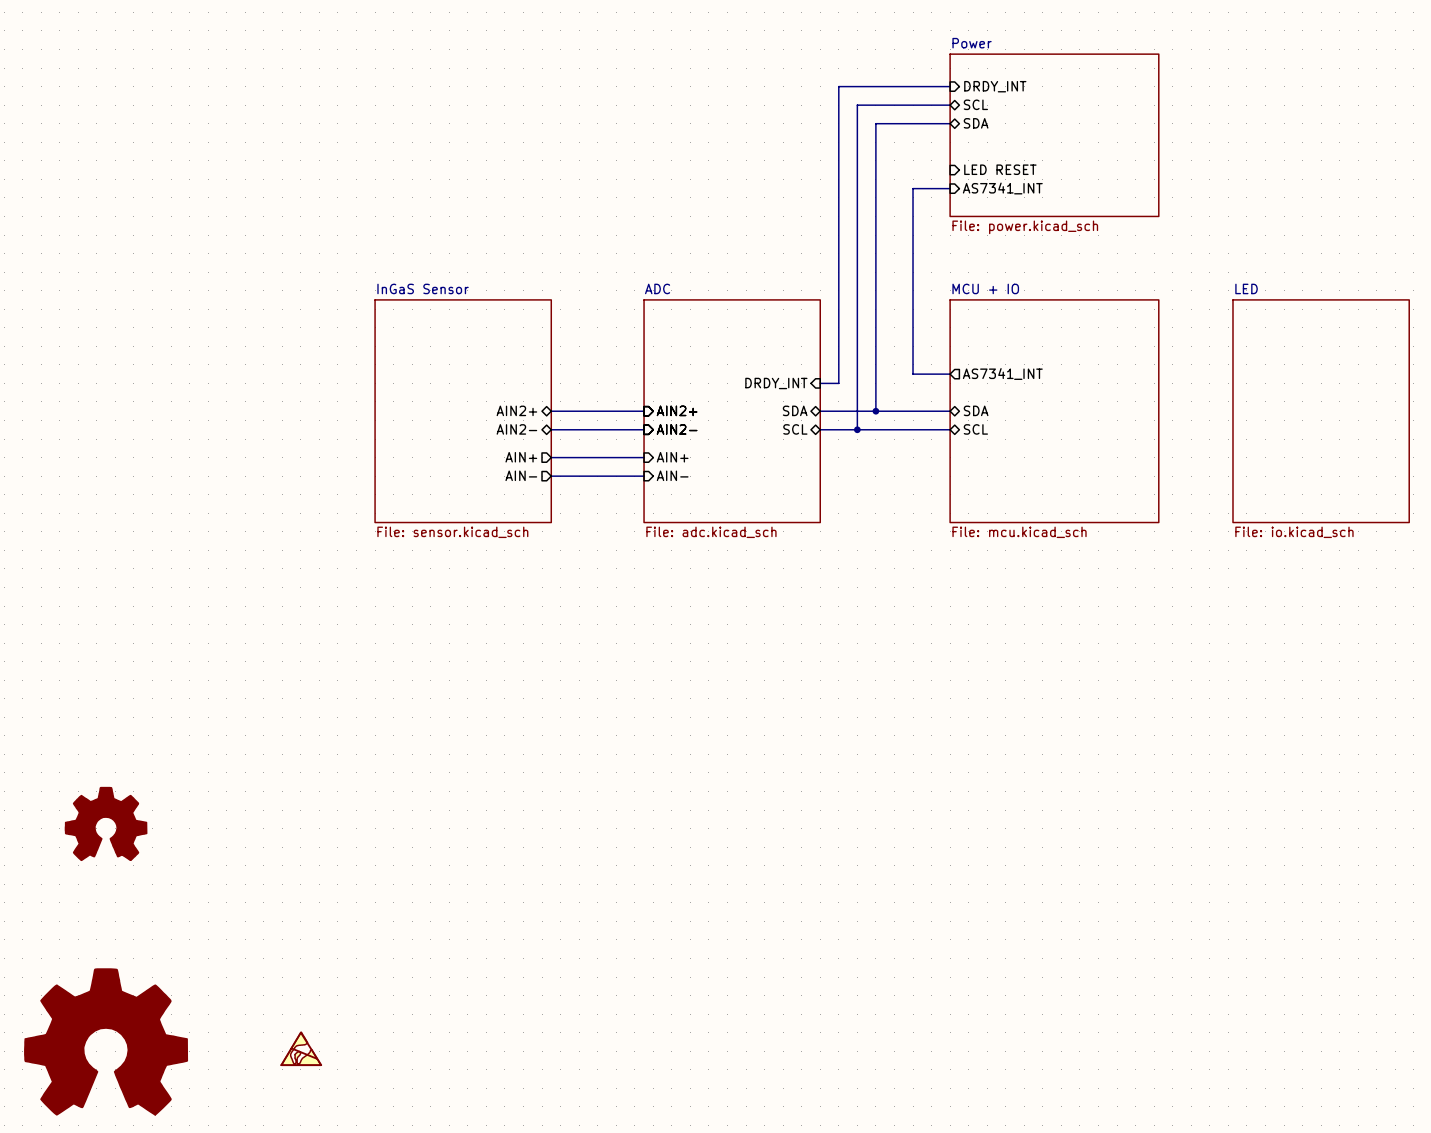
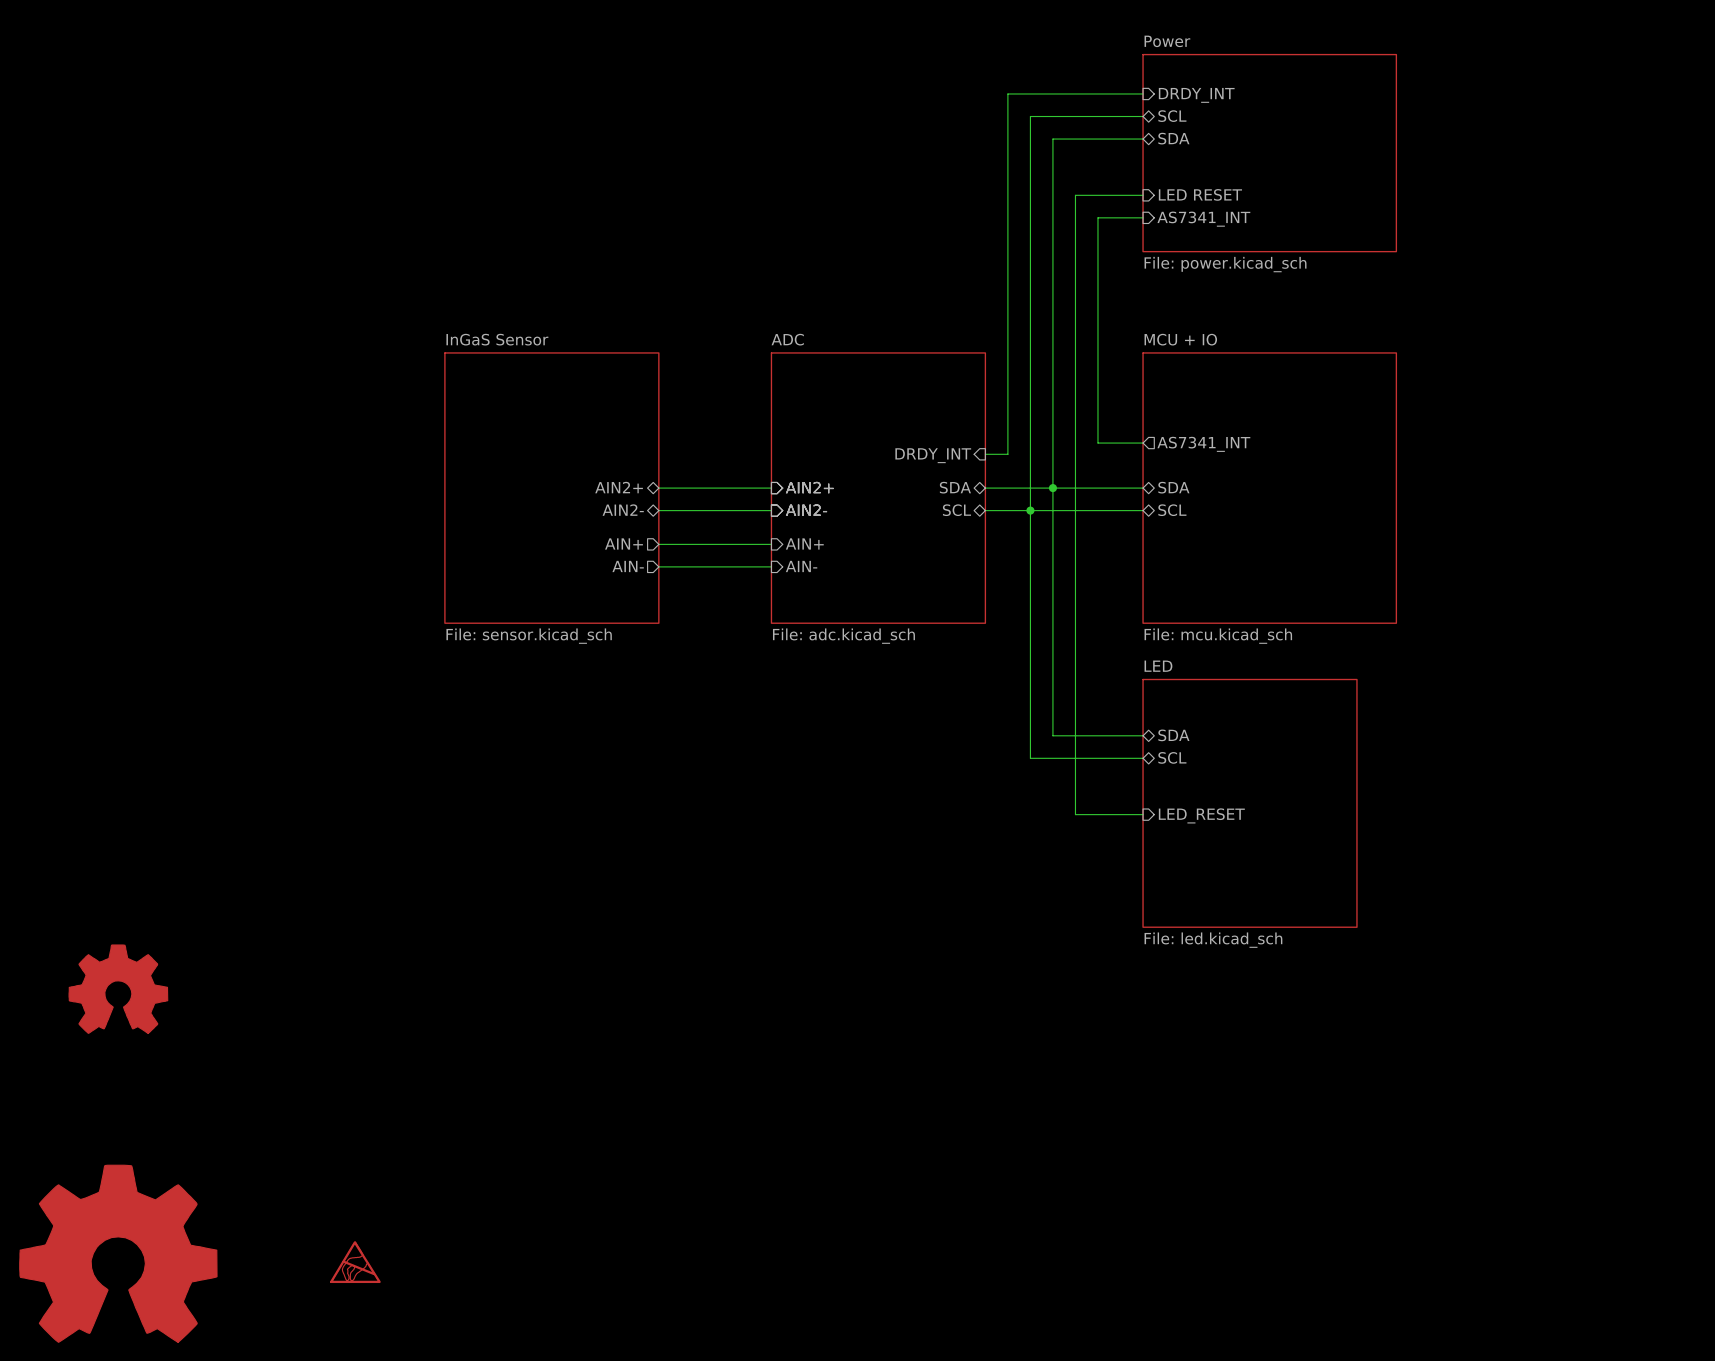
wire: none -> (1143, 195) (1075, 195) (1075, 814) (1143, 814)
wire: none -> (1052, 488) (1052, 735) (1143, 735)
sheet LED: File: io.kicad_sch (1321, 411) -> none
wire: none -> (1030, 510) (1030, 758) (1143, 758)
sheet pin: none -> SDA (1173, 735)
sheet pin: none -> SCL (1172, 757)
sheet LED: none -> File: led.kicad_sch (1249, 803)
sheet pin: none -> LED_RESET (1201, 815)

